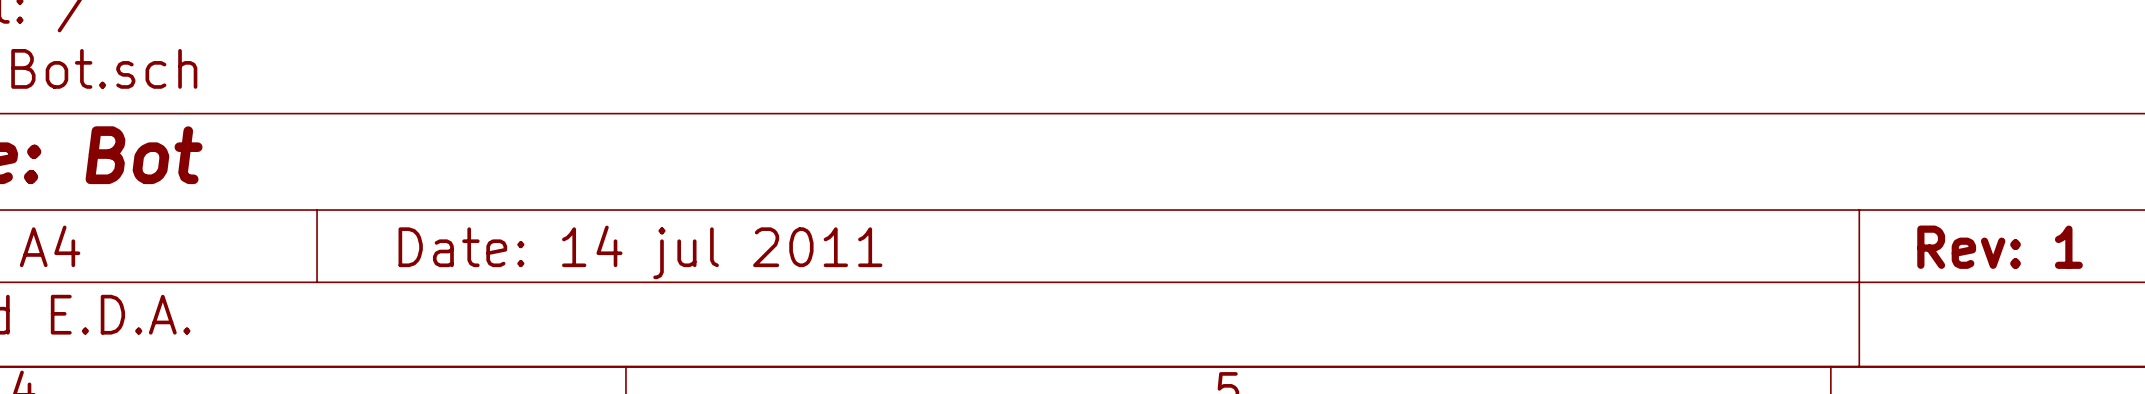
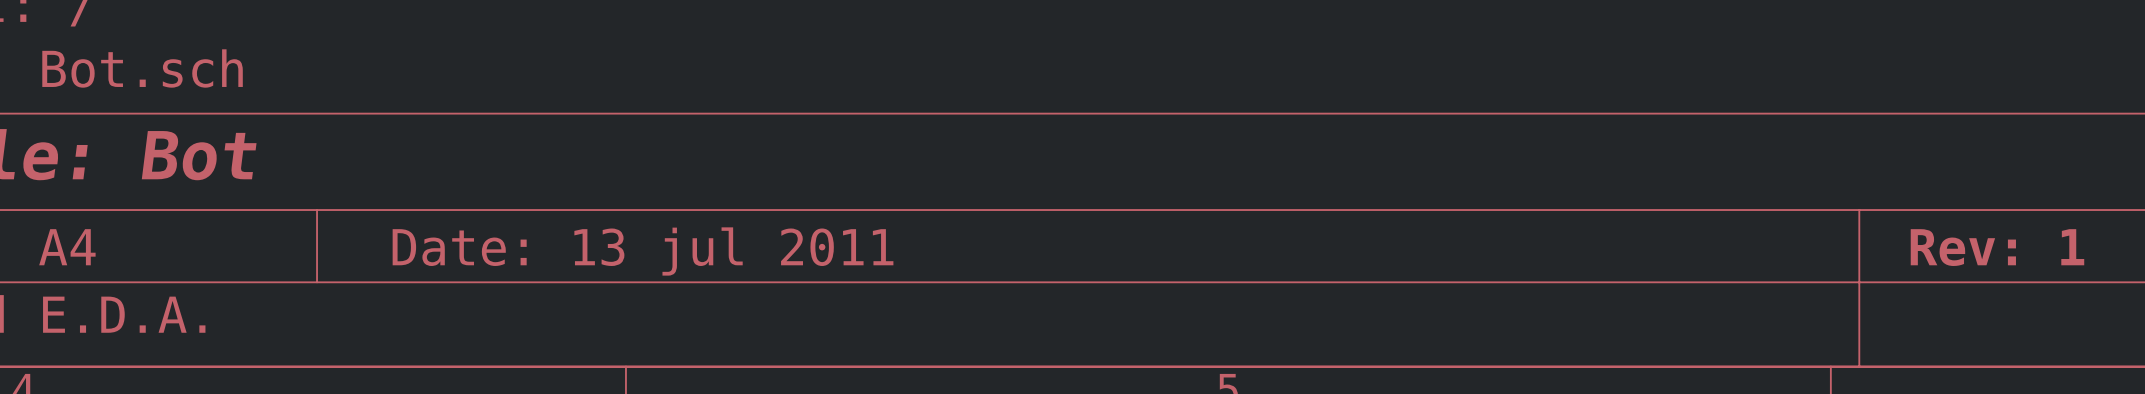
title block: Date: 14 jul 2011 (640, 252) -> Date: 13 jul 2011 (643, 251)

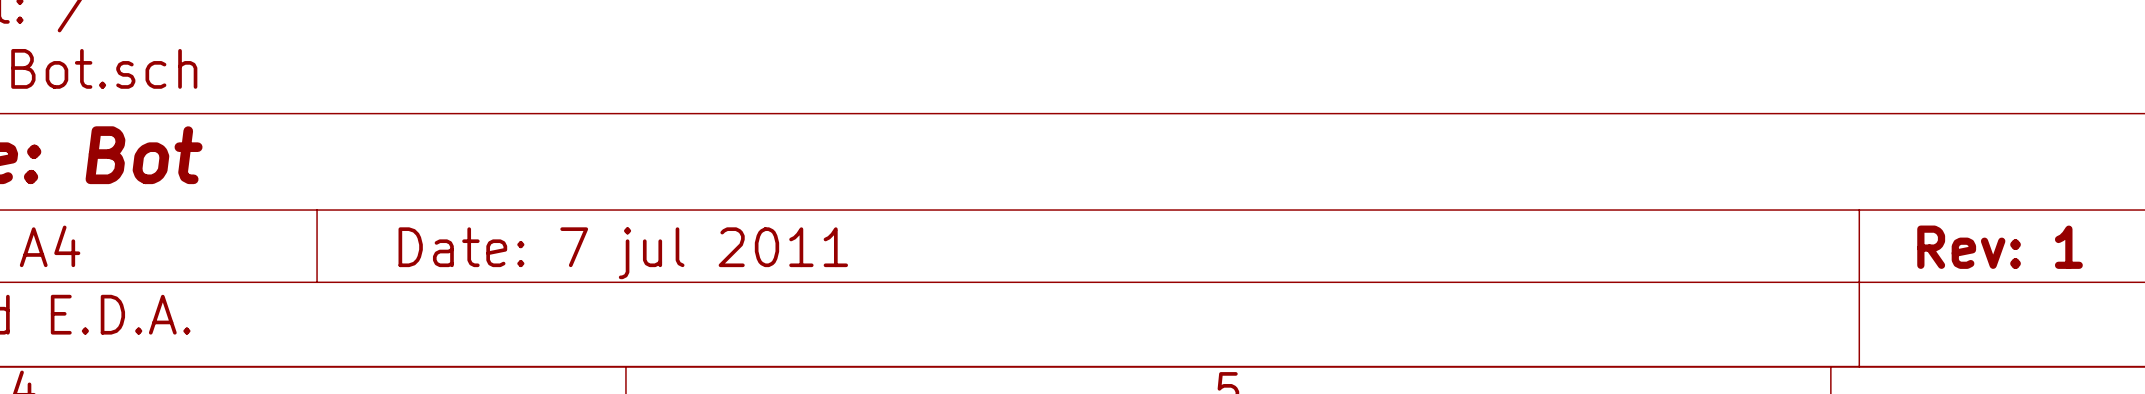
title block: Date: 13 jul 2011 (643, 251) -> Date: 7 jul 2011 (623, 253)

